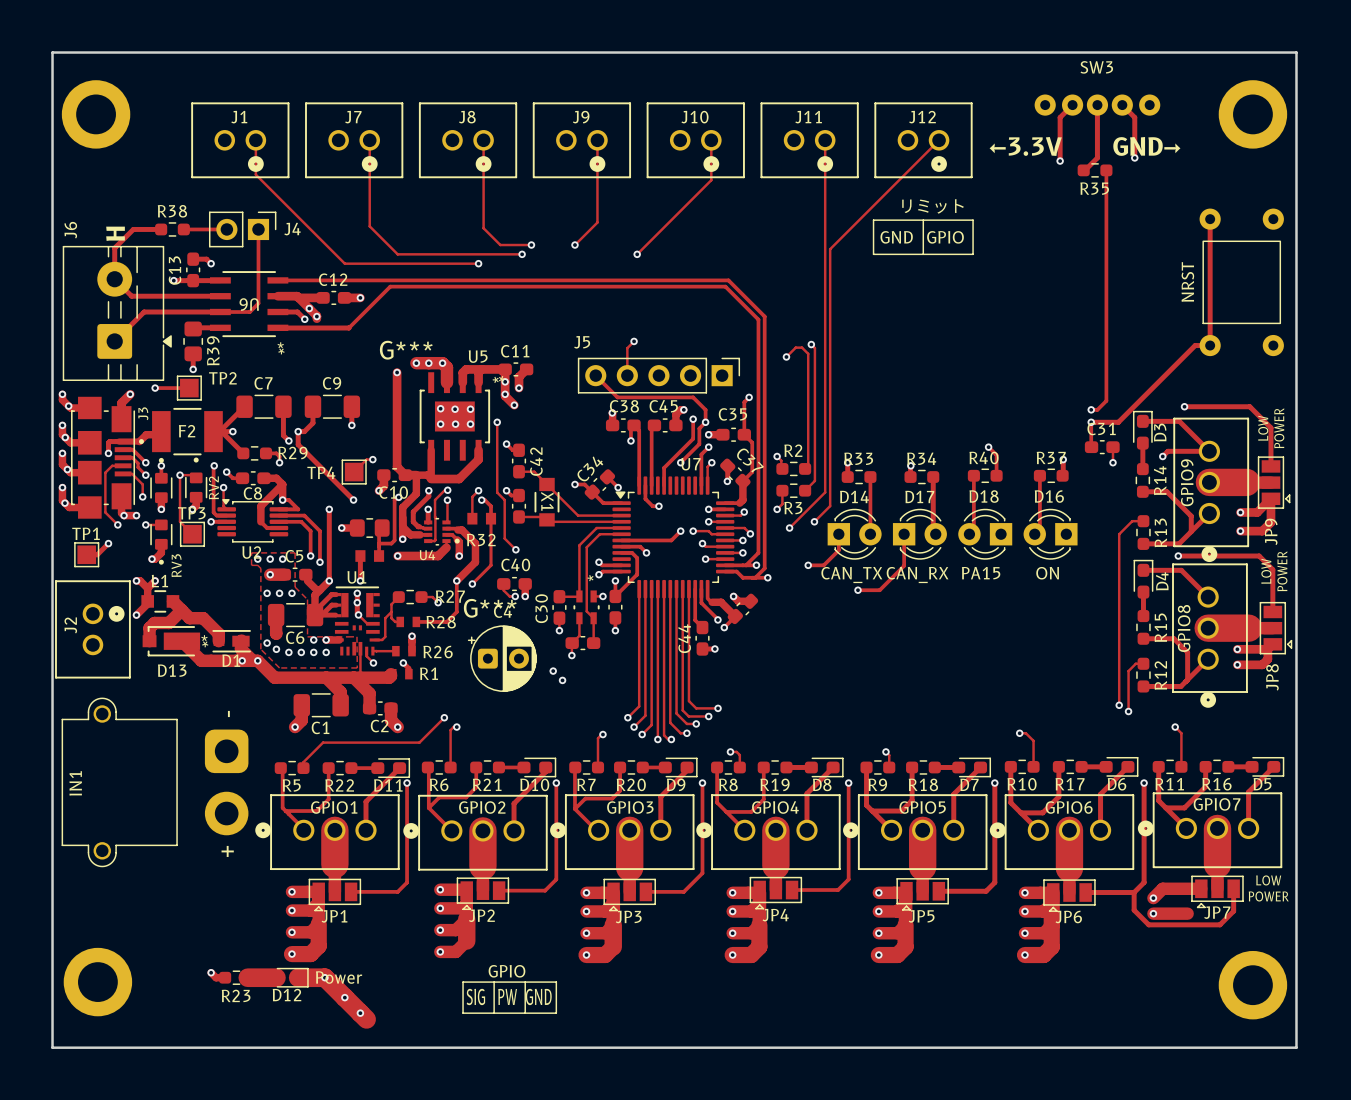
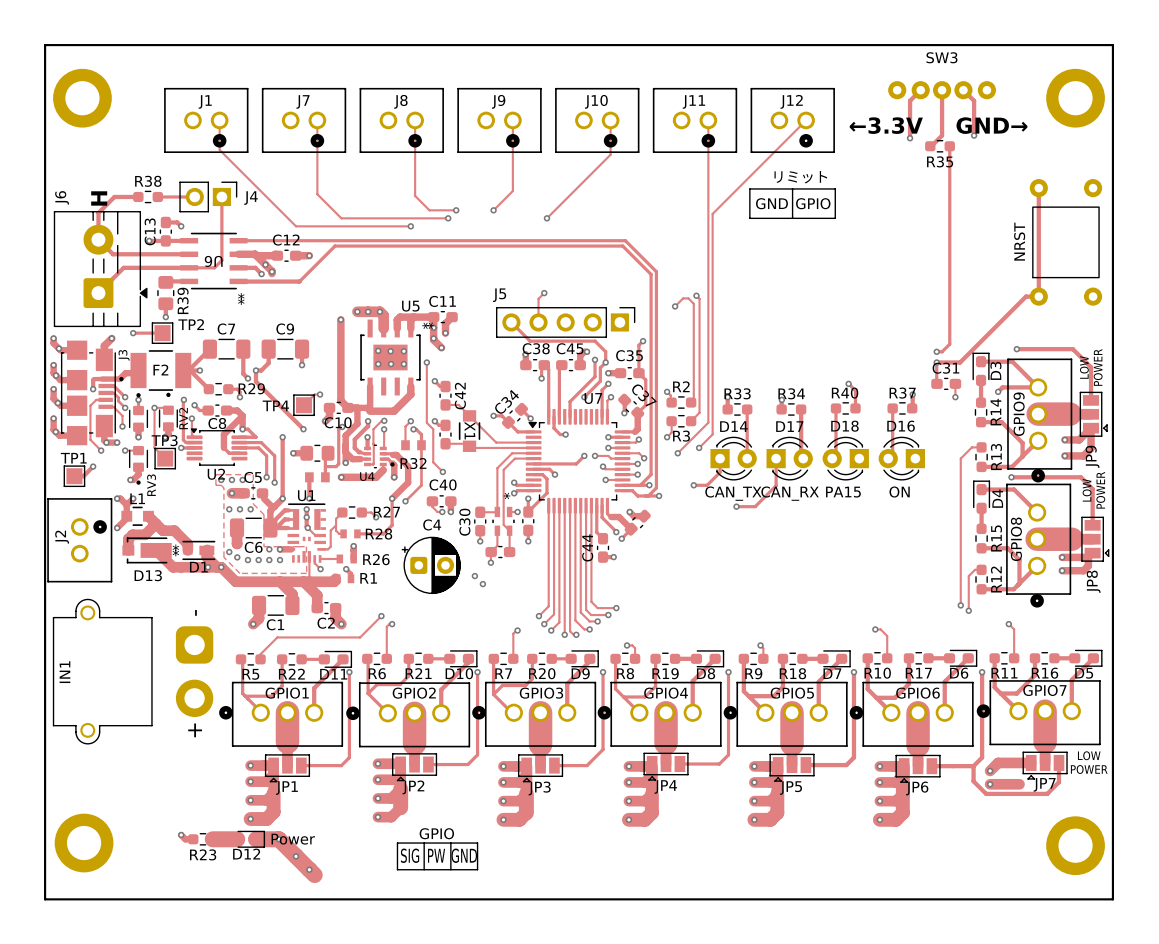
G***: (406, 350) -> none
G***: (490, 608) -> none

